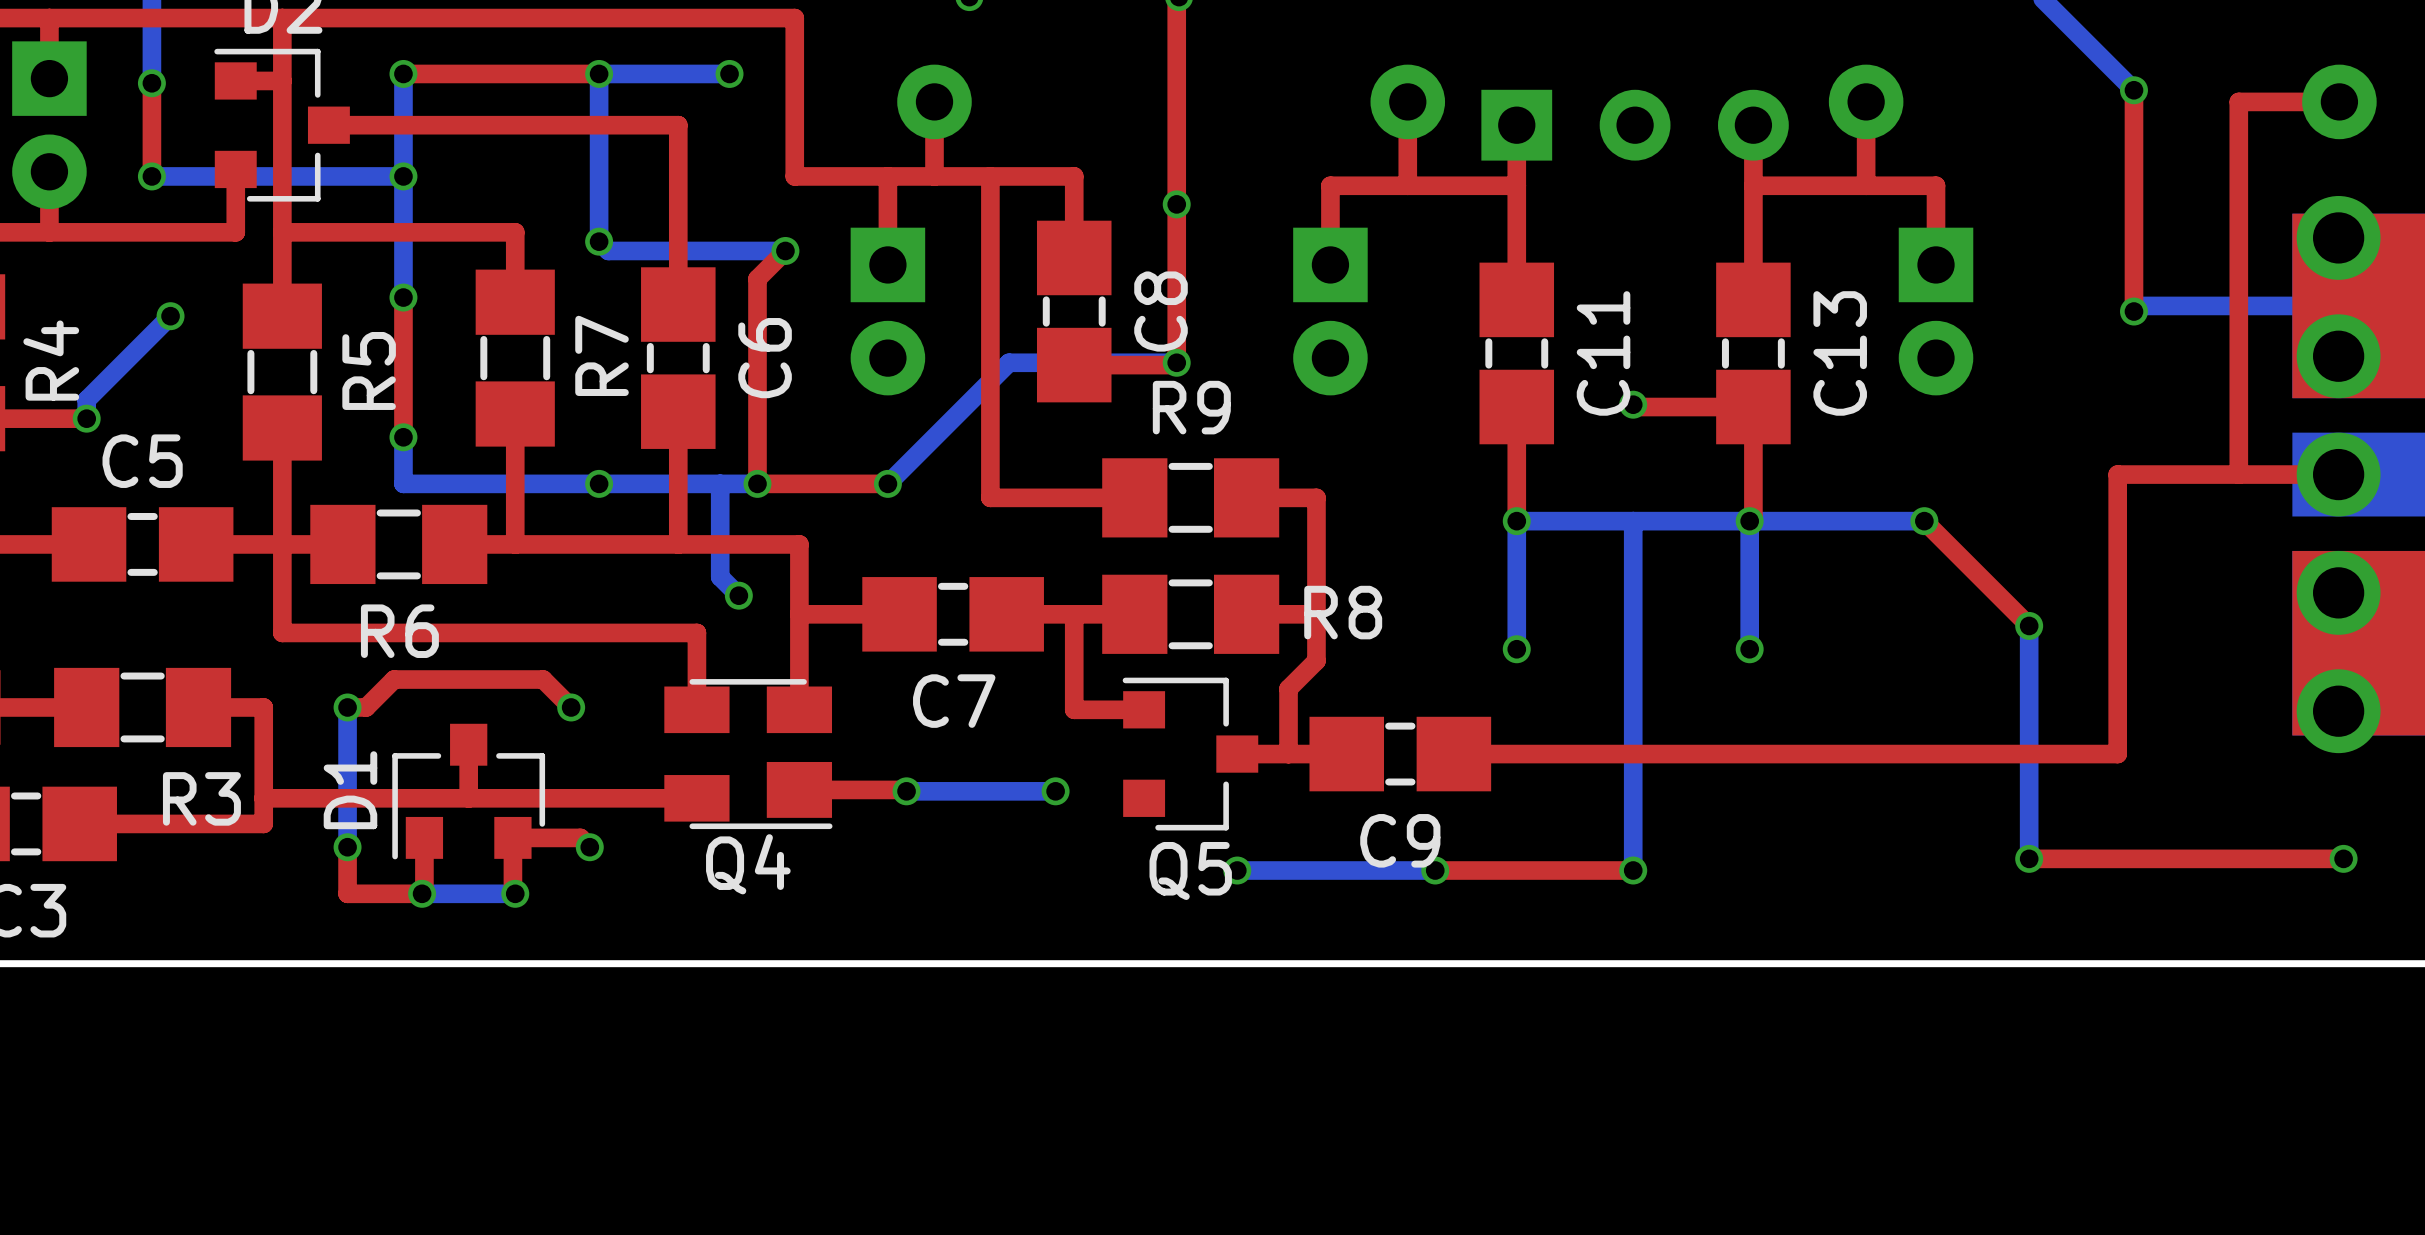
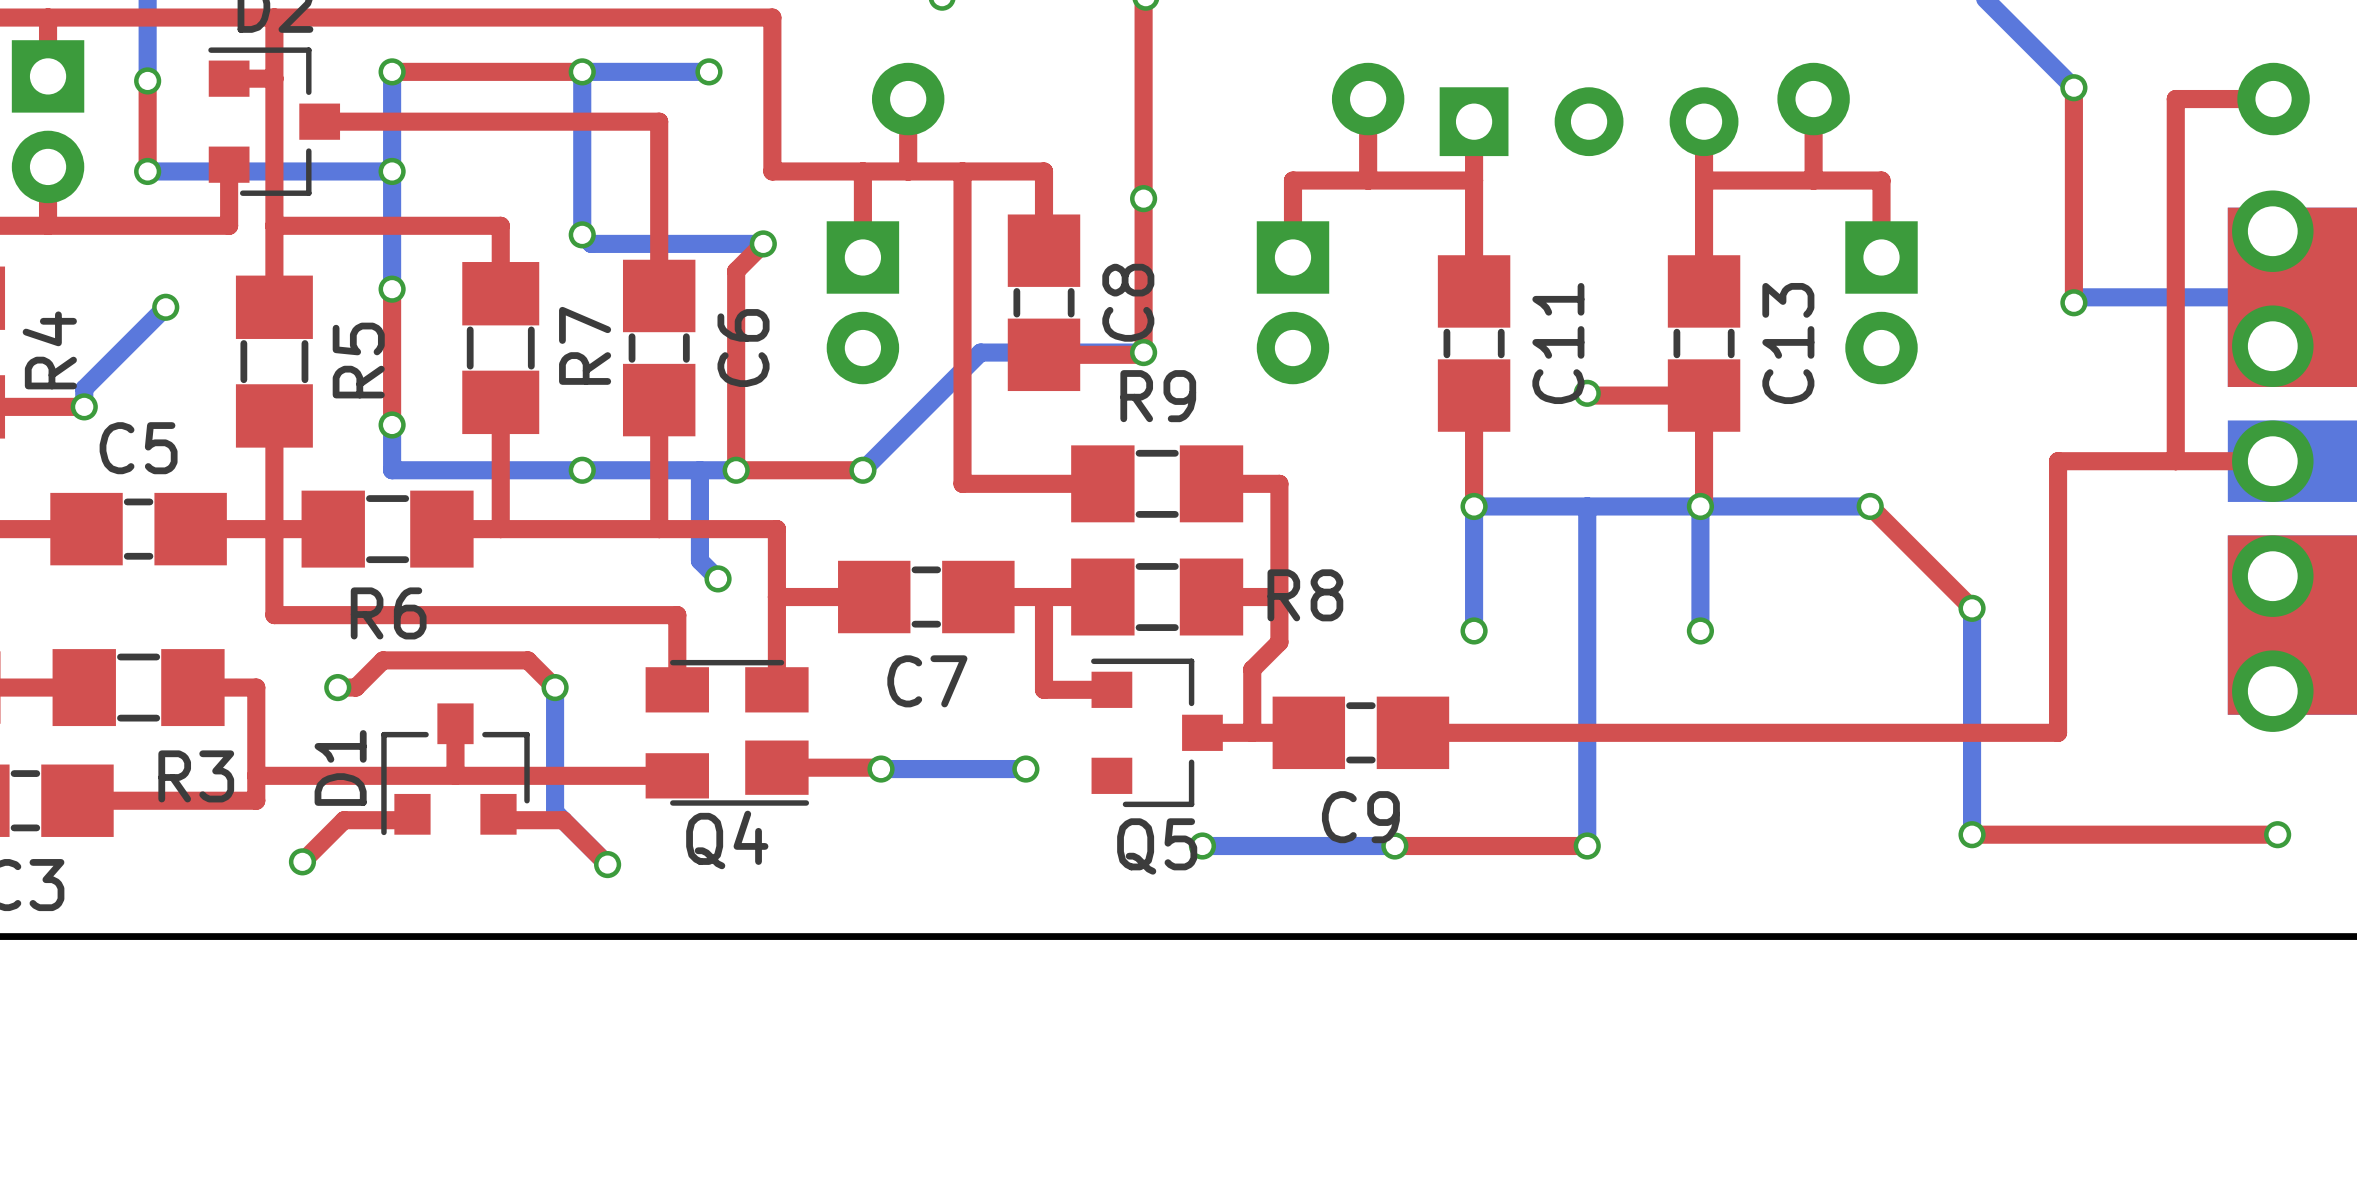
bottom track: (347, 707) (347, 847) -> none
bottom track: none -> (555, 687) (555, 812) (607, 864)
top track: (424, 837) (424, 893) (347, 893) (347, 847) -> none
top track: none -> (412, 820) (344, 820) (302, 861)
top track: none -> (498, 820) (563, 820) (607, 864)
via position: (347, 847) -> (302, 861)
top track: (589, 847) (580, 837) (512, 837) (512, 891) (515, 893) -> none
via: (589, 847) -> none
via: none -> (607, 864)
bottom track: (422, 893) (515, 893) -> none
via: (422, 893) -> none
via: (515, 893) -> none

